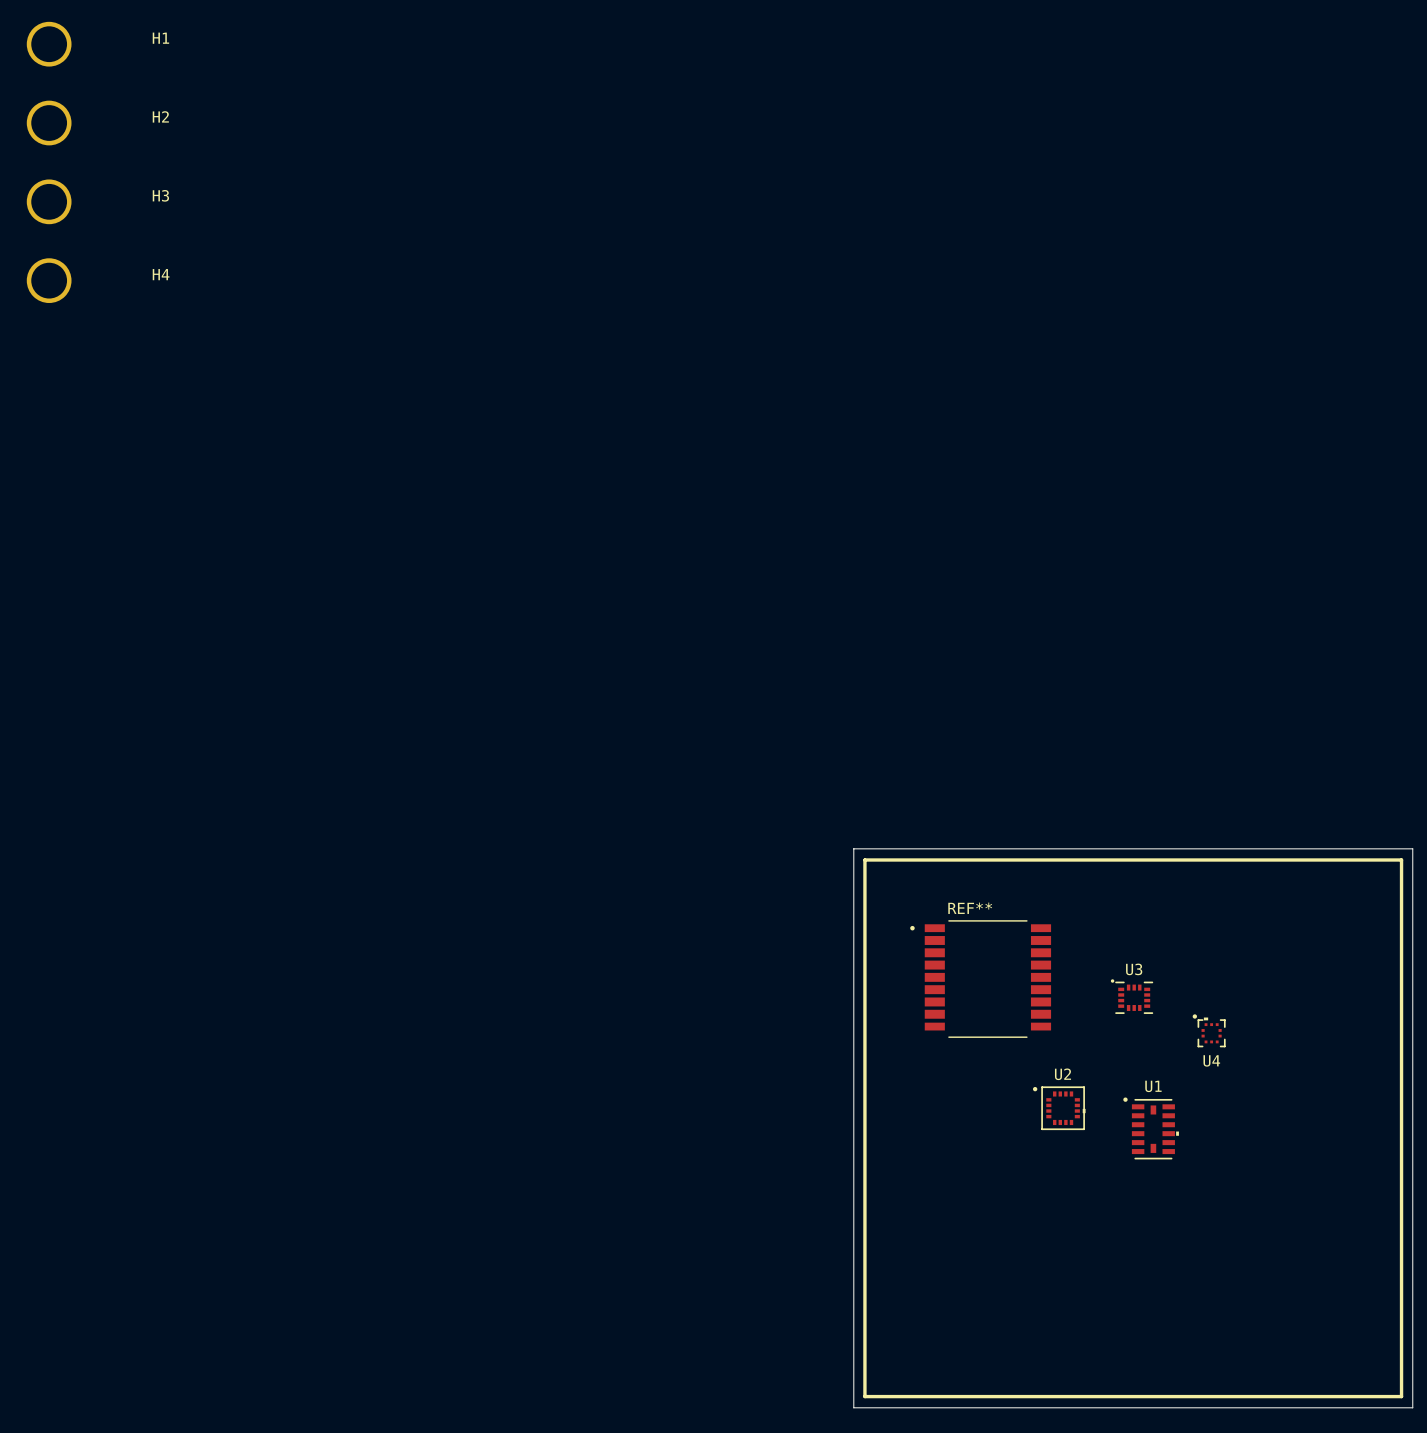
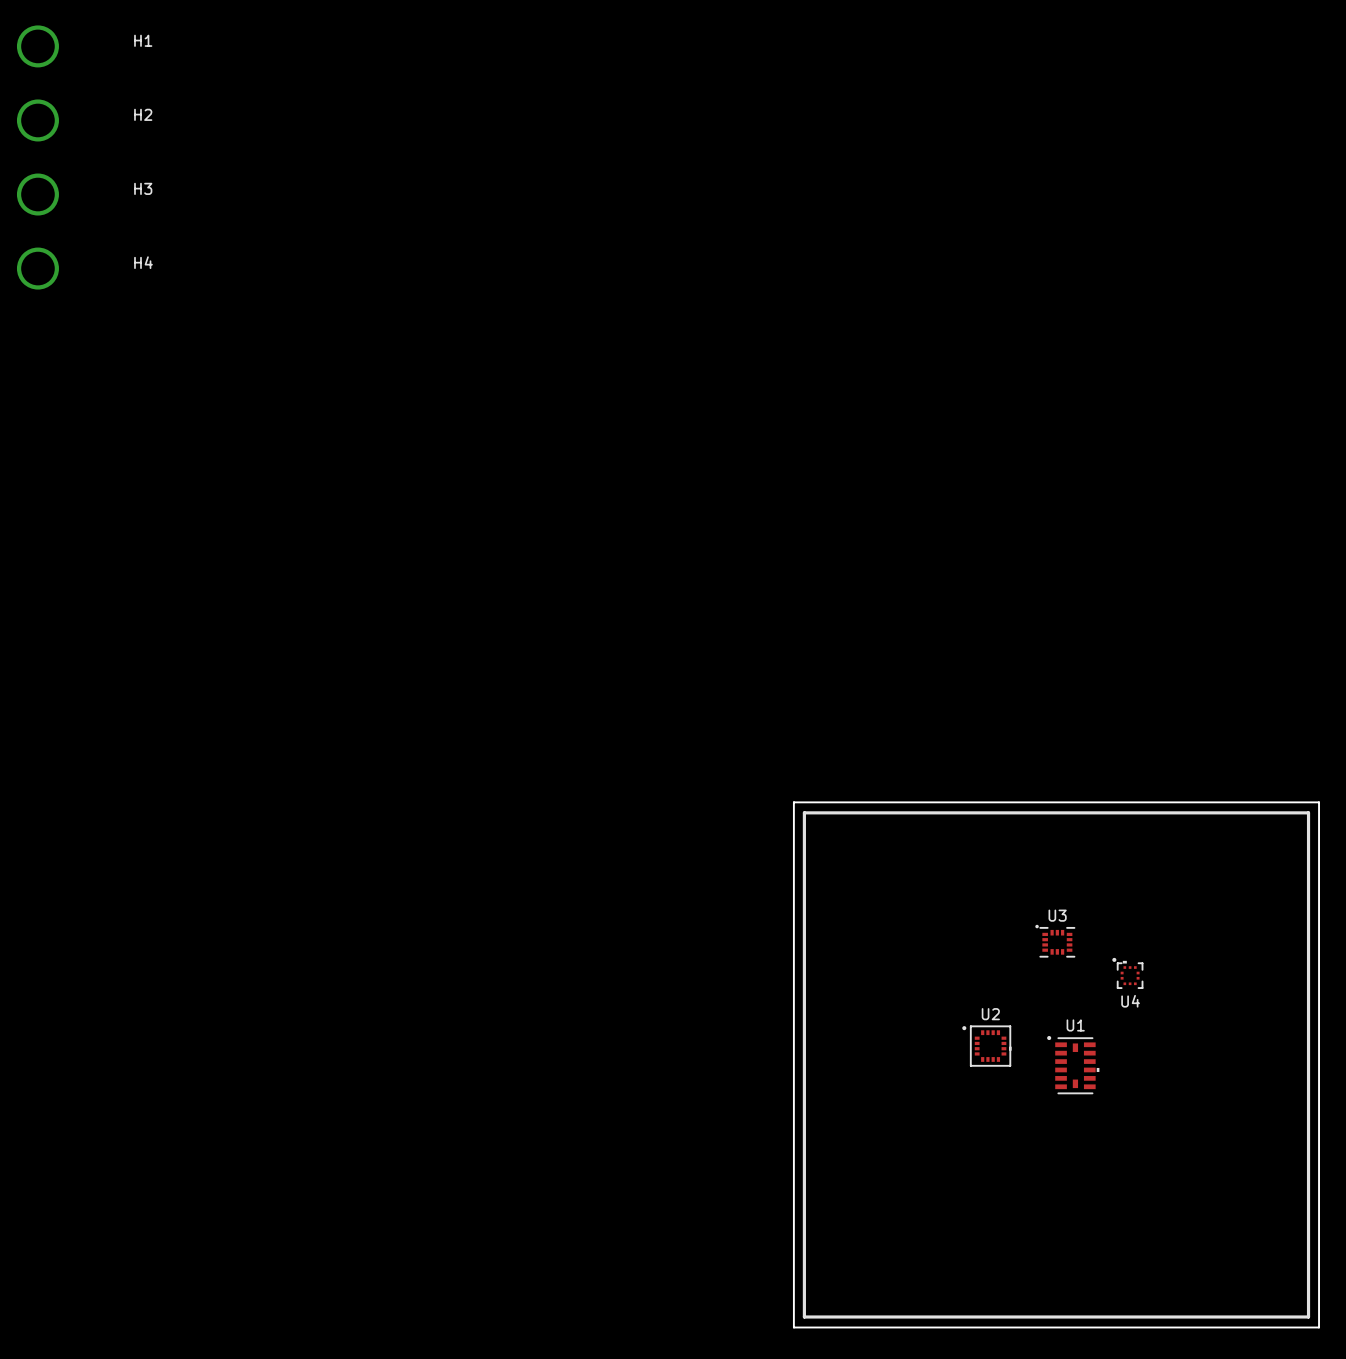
REF**: (980, 979) -> none

